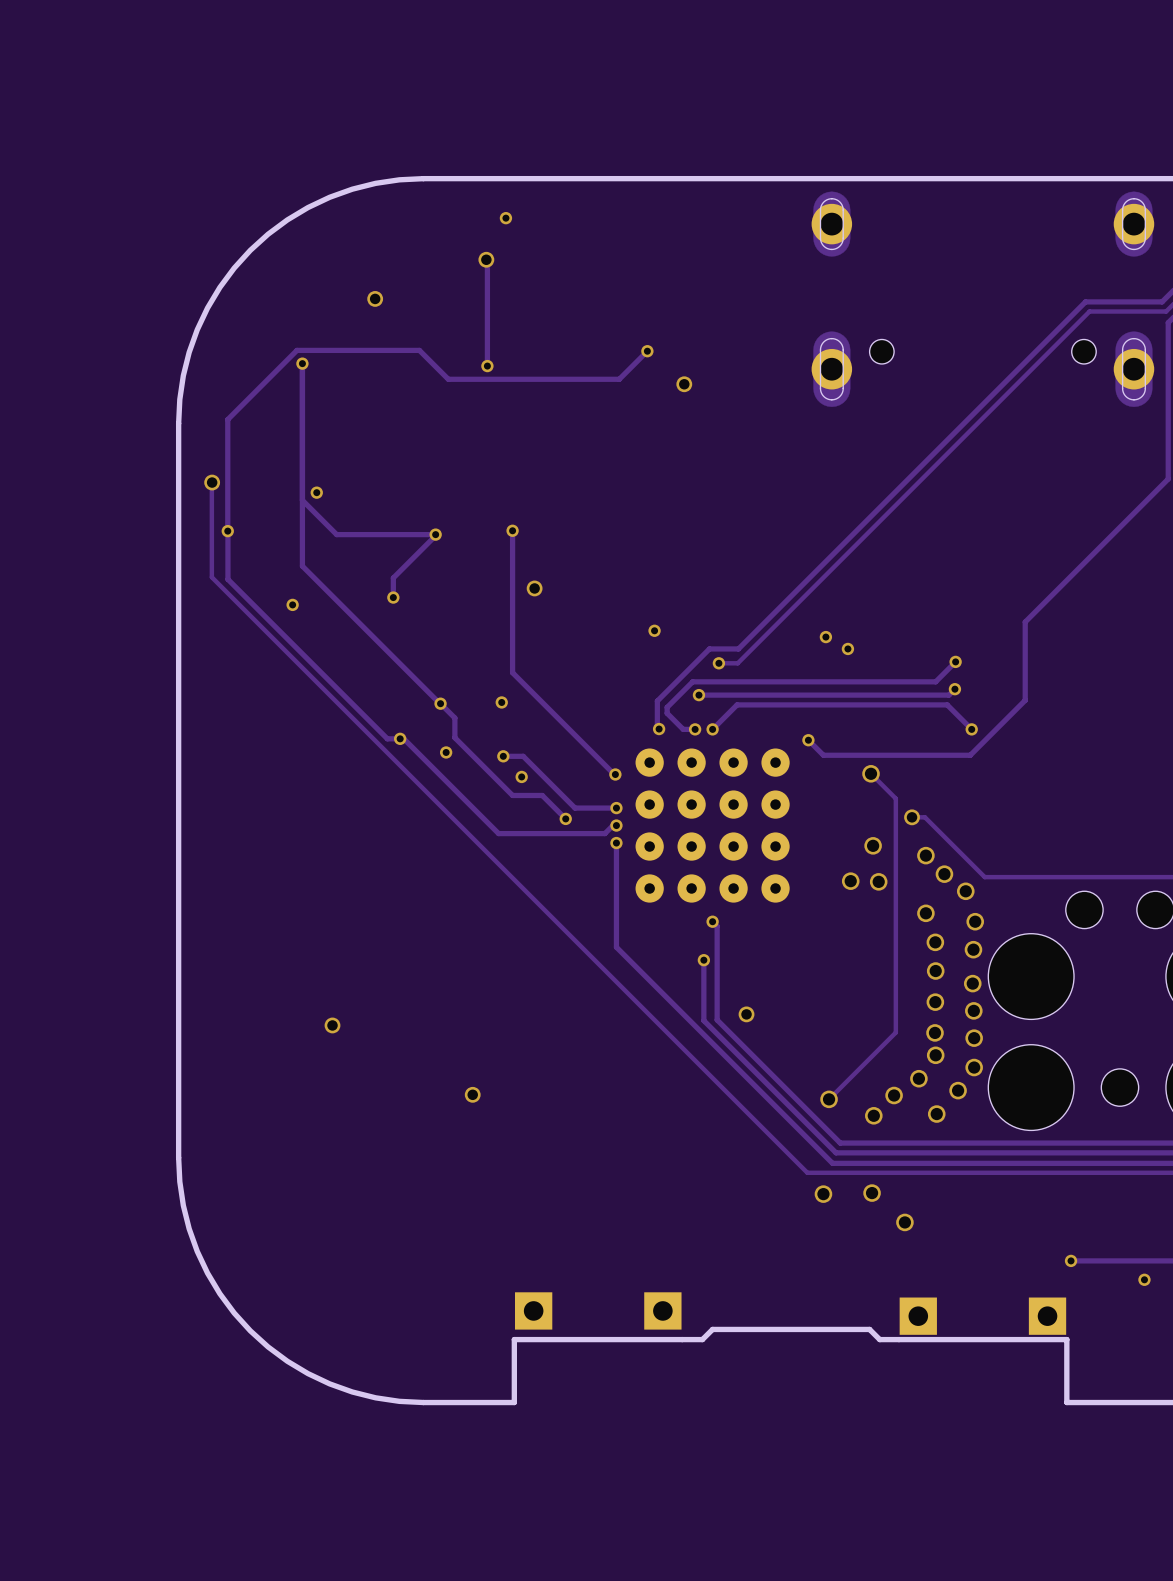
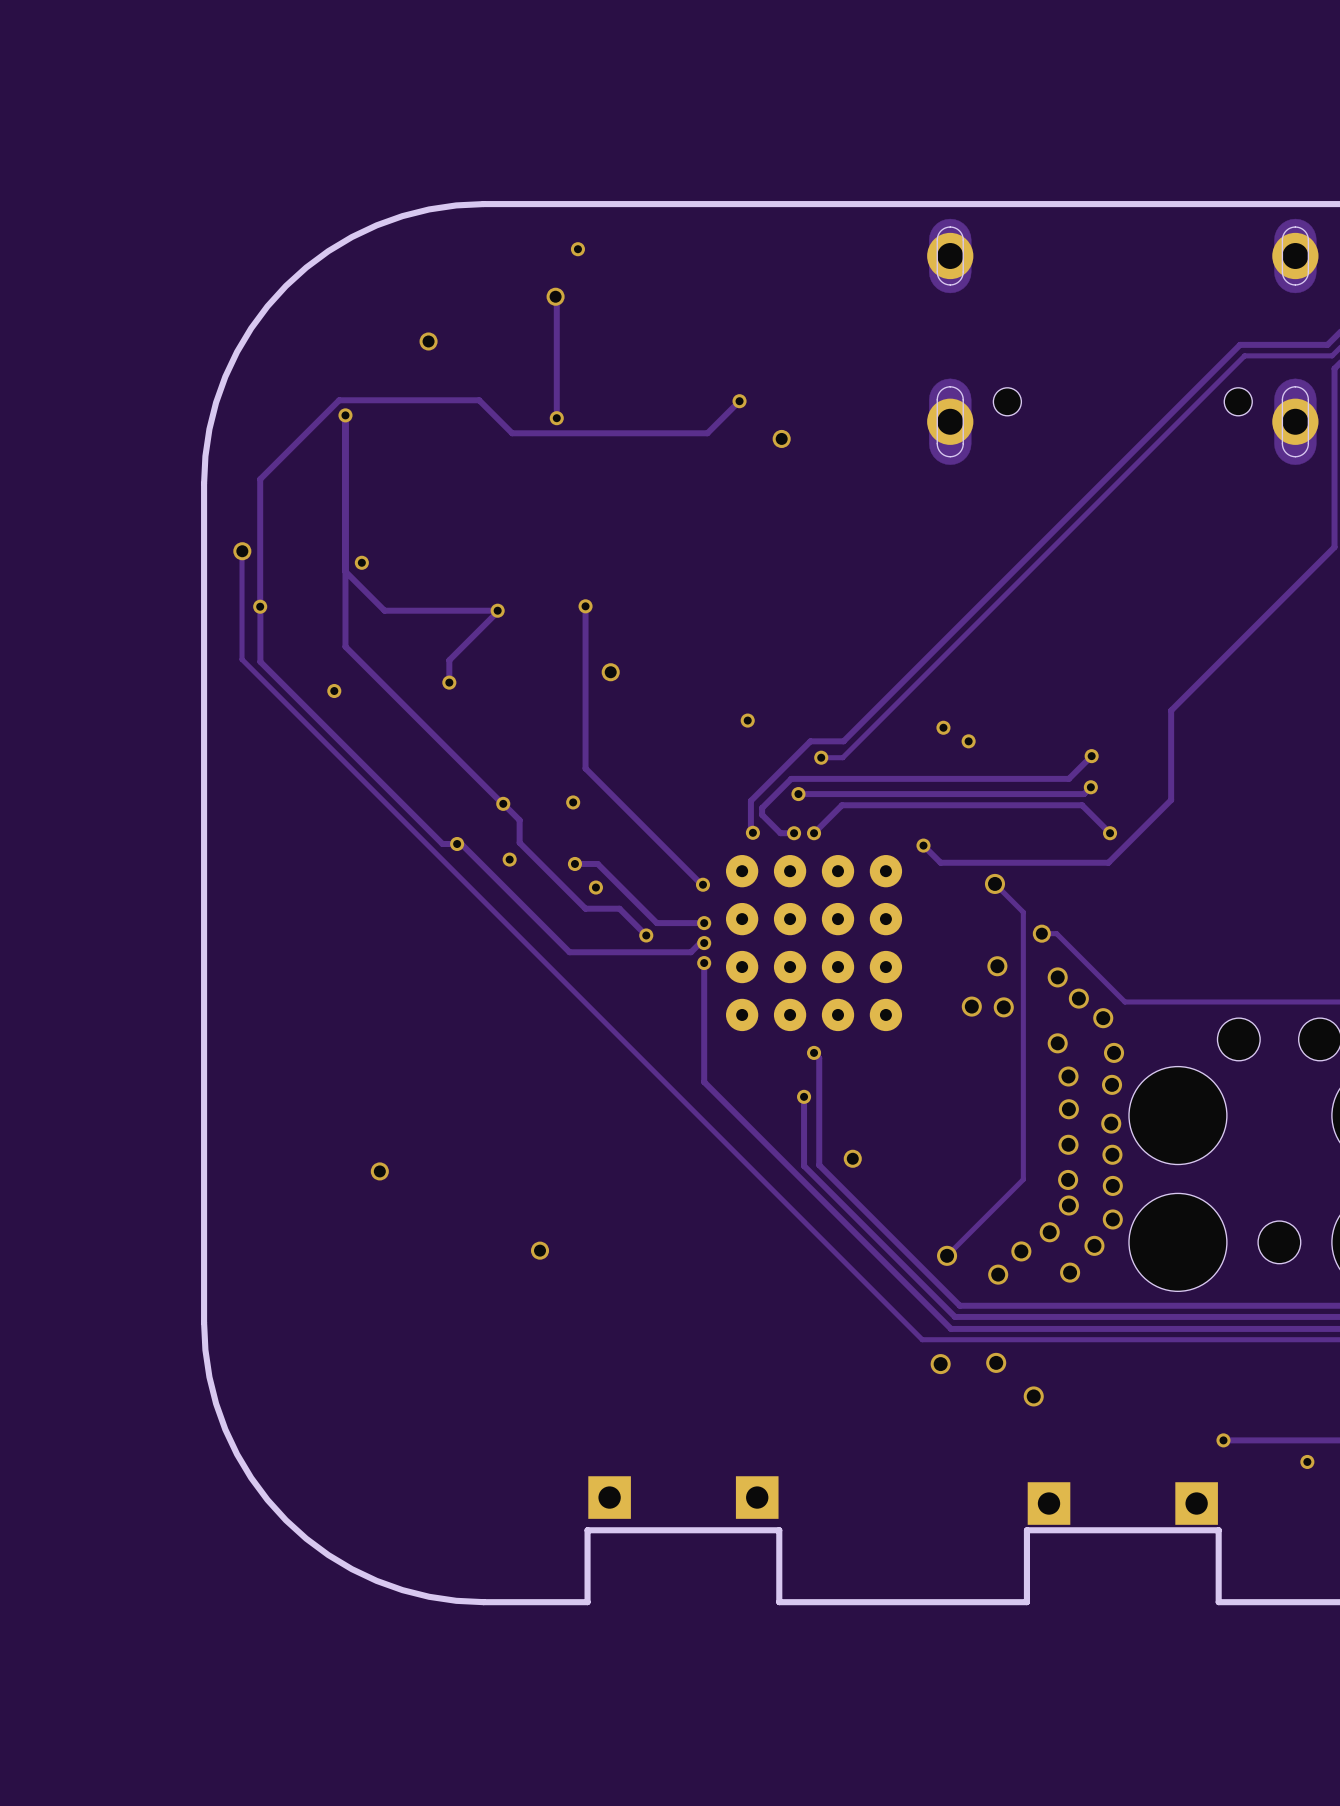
board edge: (898, 1339) (879, 1339) (869, 1329) (712, 1329) (702, 1339) (682, 1339) -> (1026, 1530) (1026, 1602) (779, 1602) (779, 1530)

